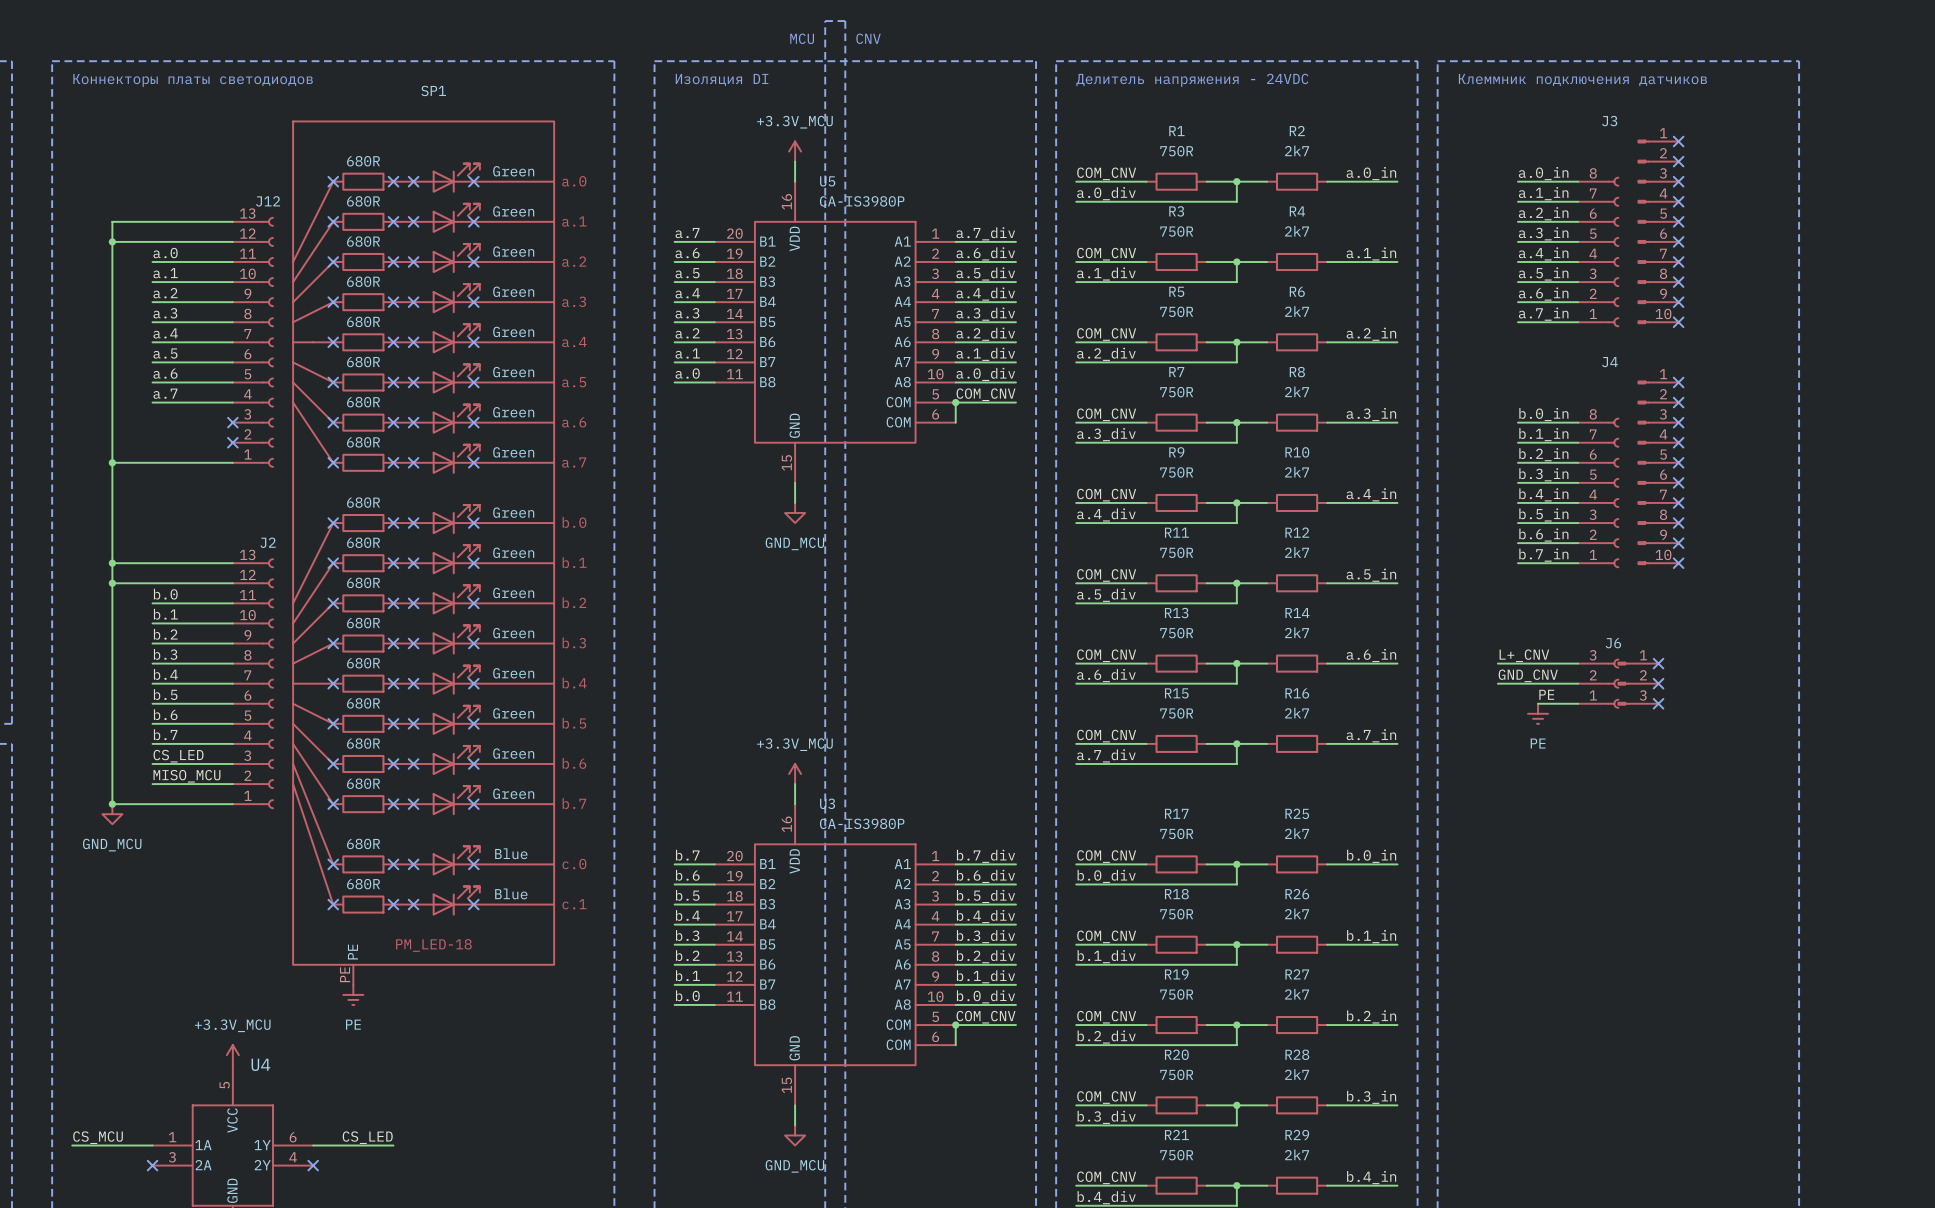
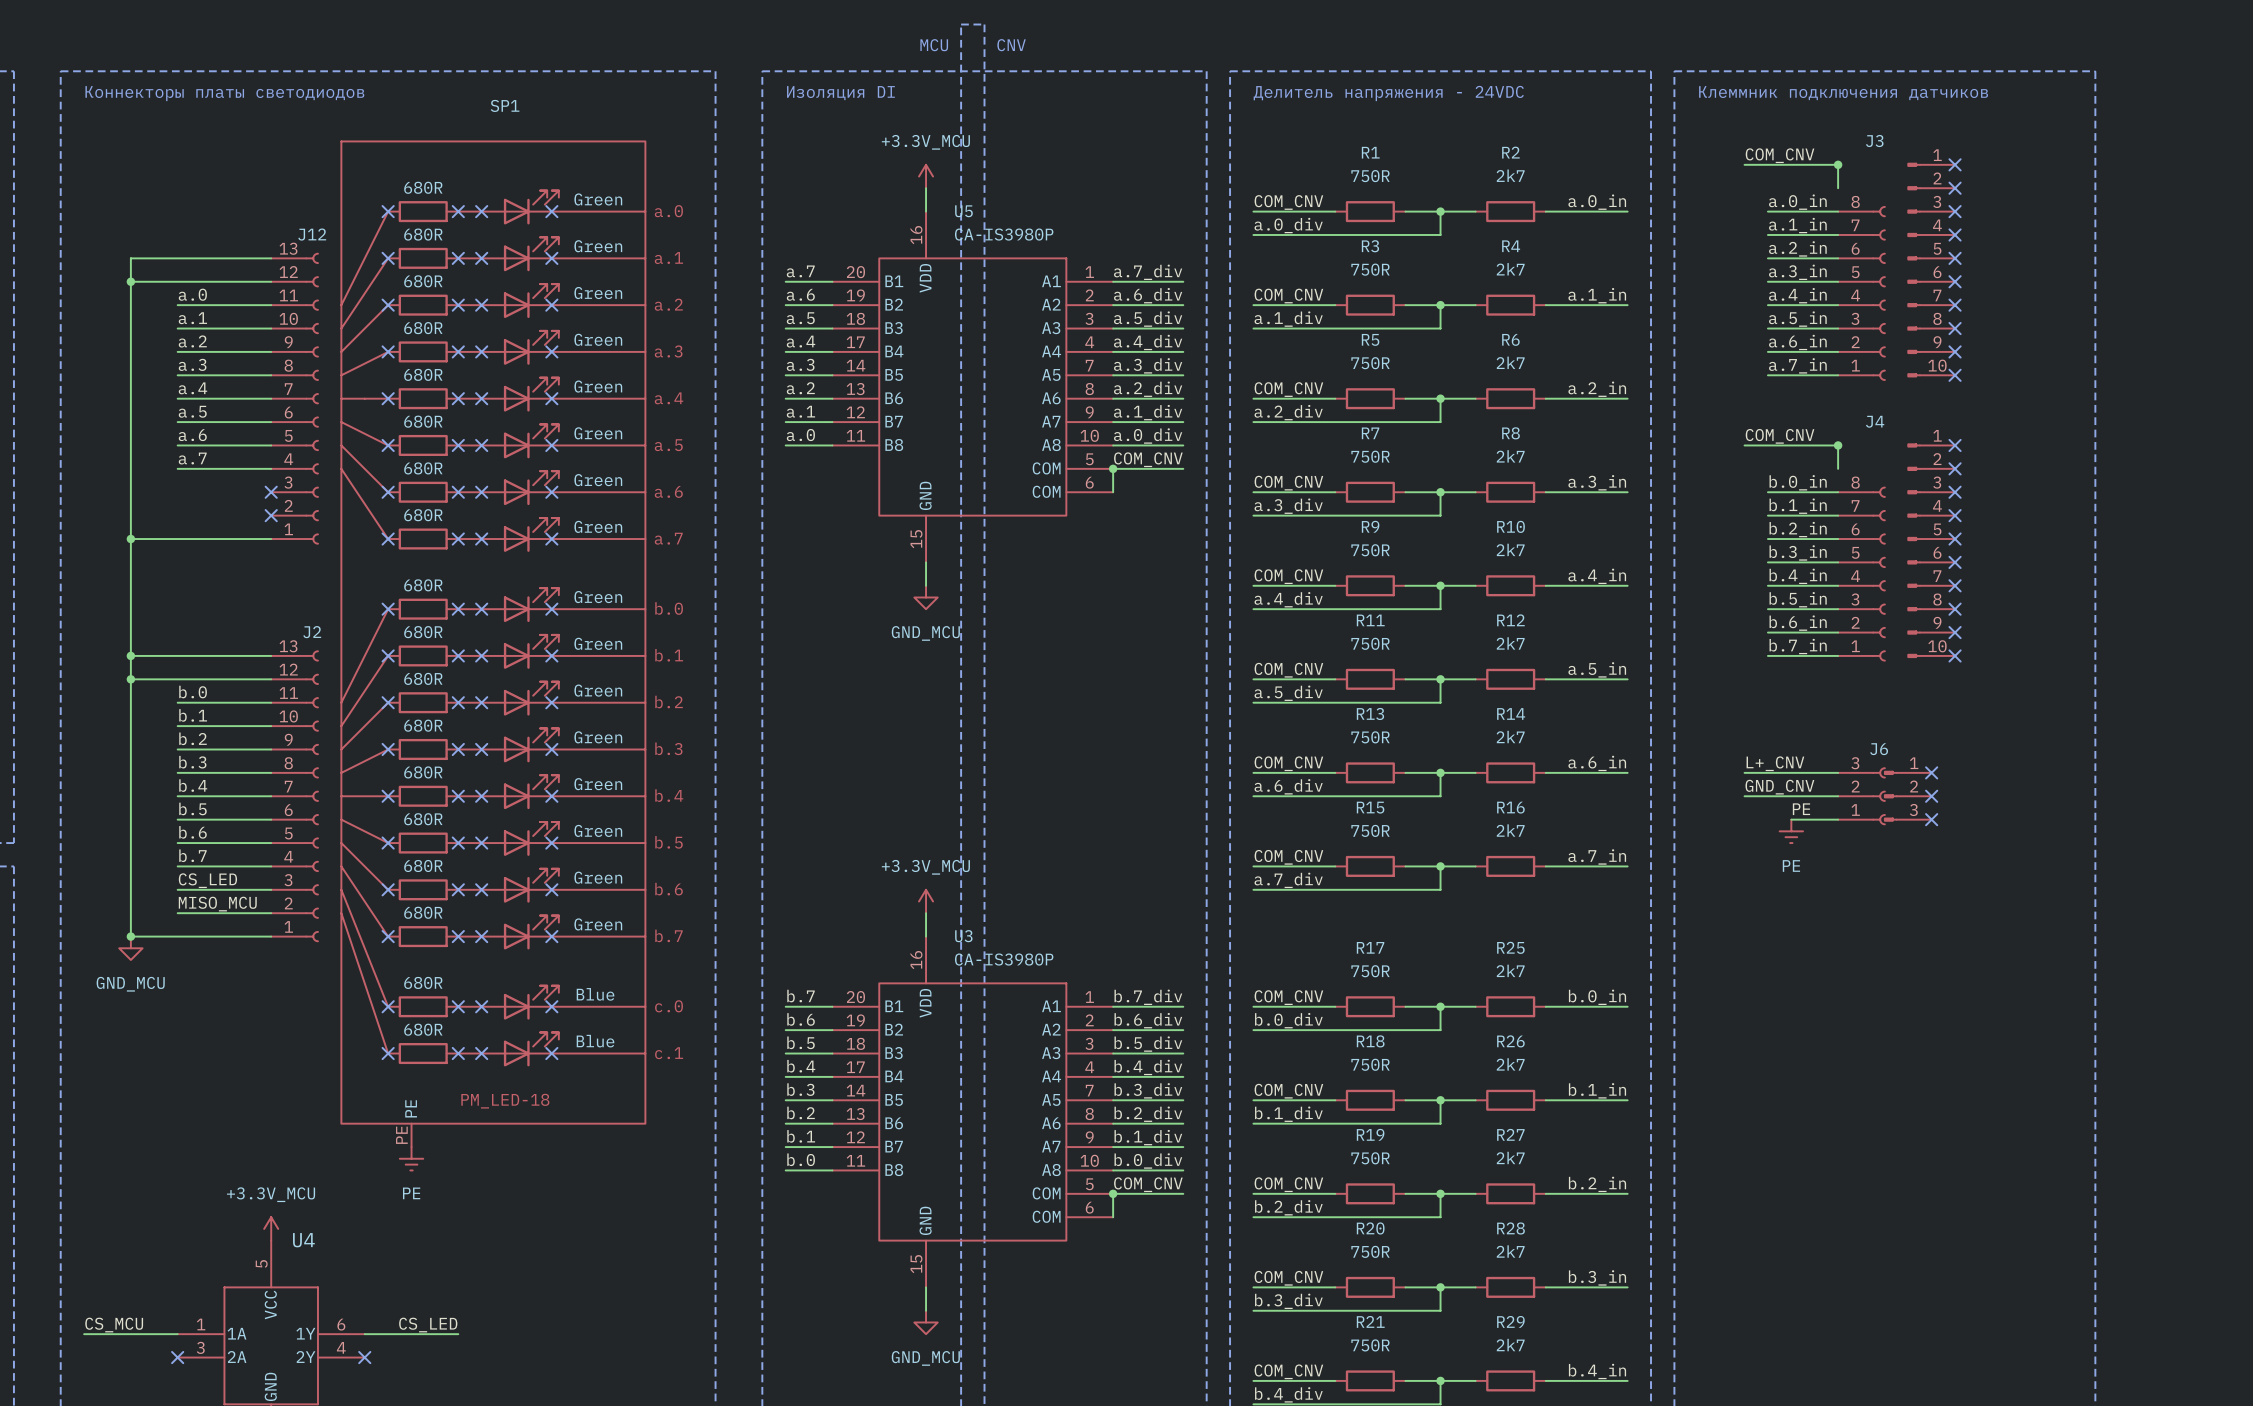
label: none -> COM_CNV (1780, 155)
wire: none -> (1744, 164) (1838, 164) (1838, 188)
junction: none -> (1838, 164)
label: none -> COM_CNV (1780, 436)
wire: none -> (1744, 445) (1838, 445) (1838, 468)
junction: none -> (1838, 445)

